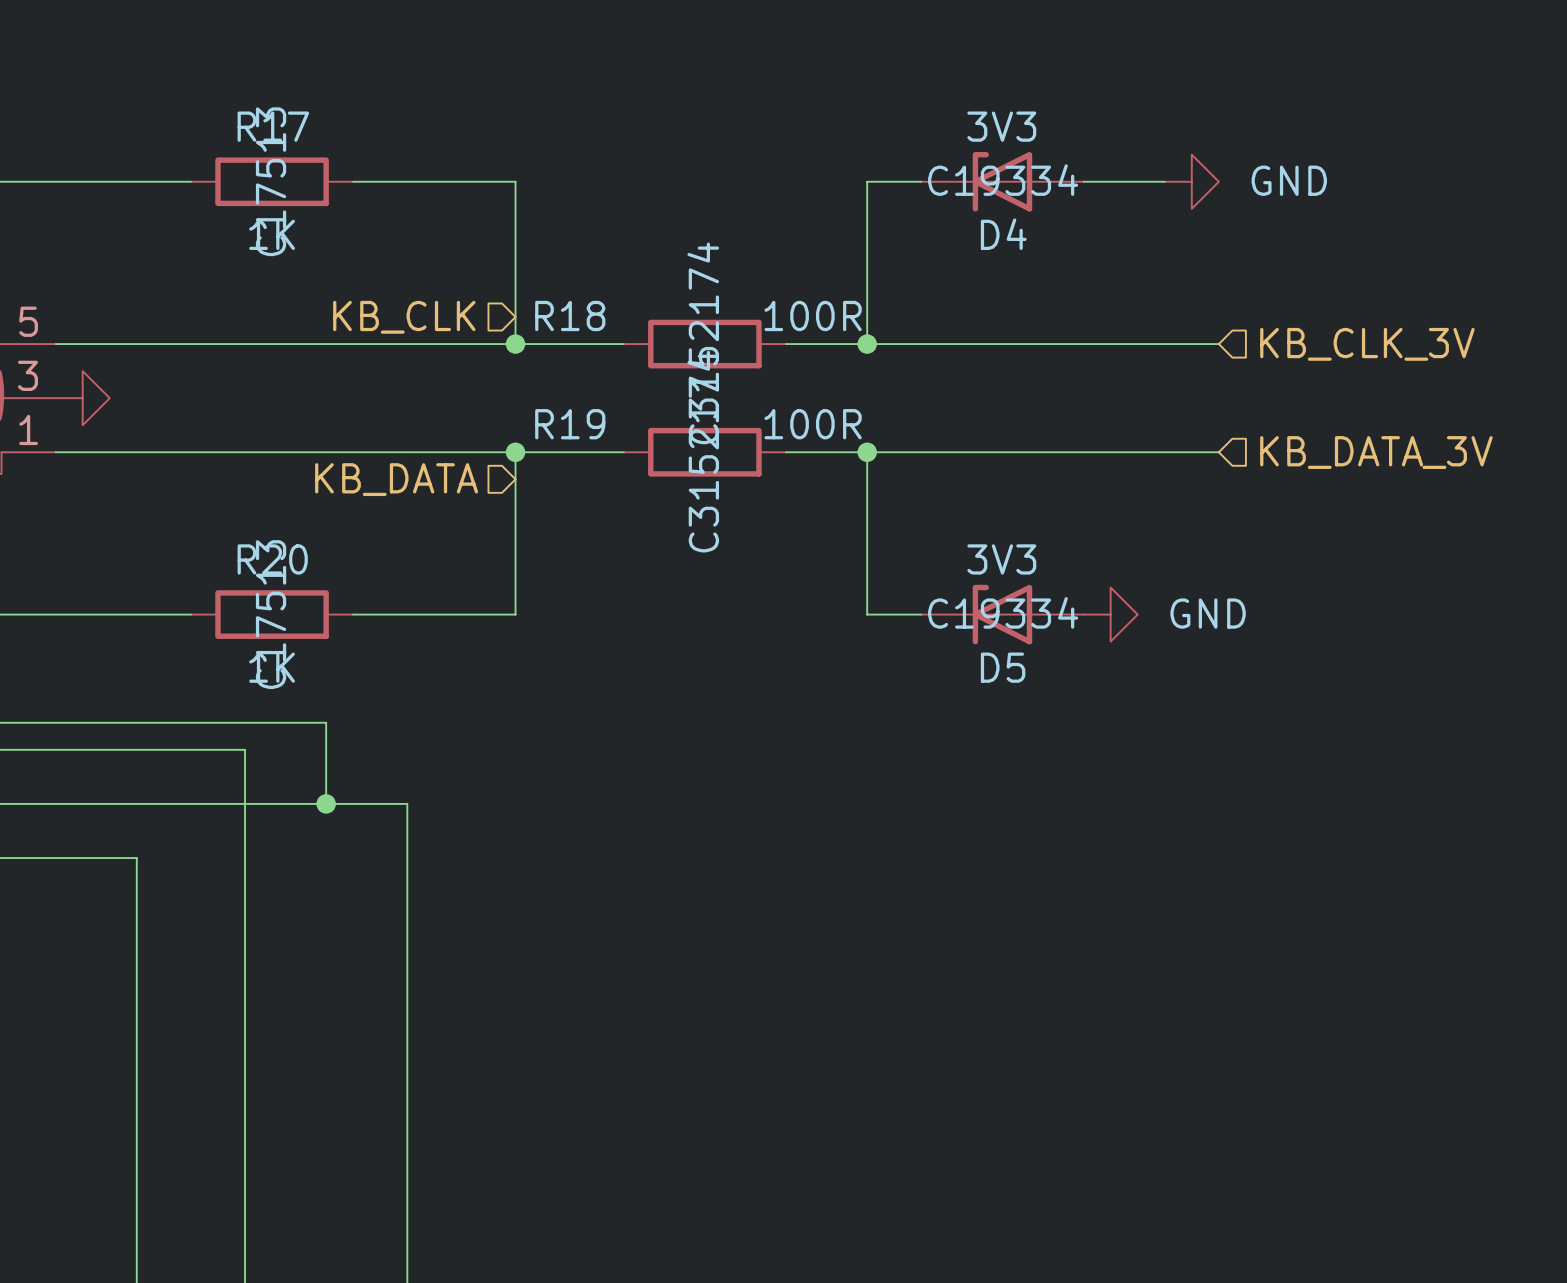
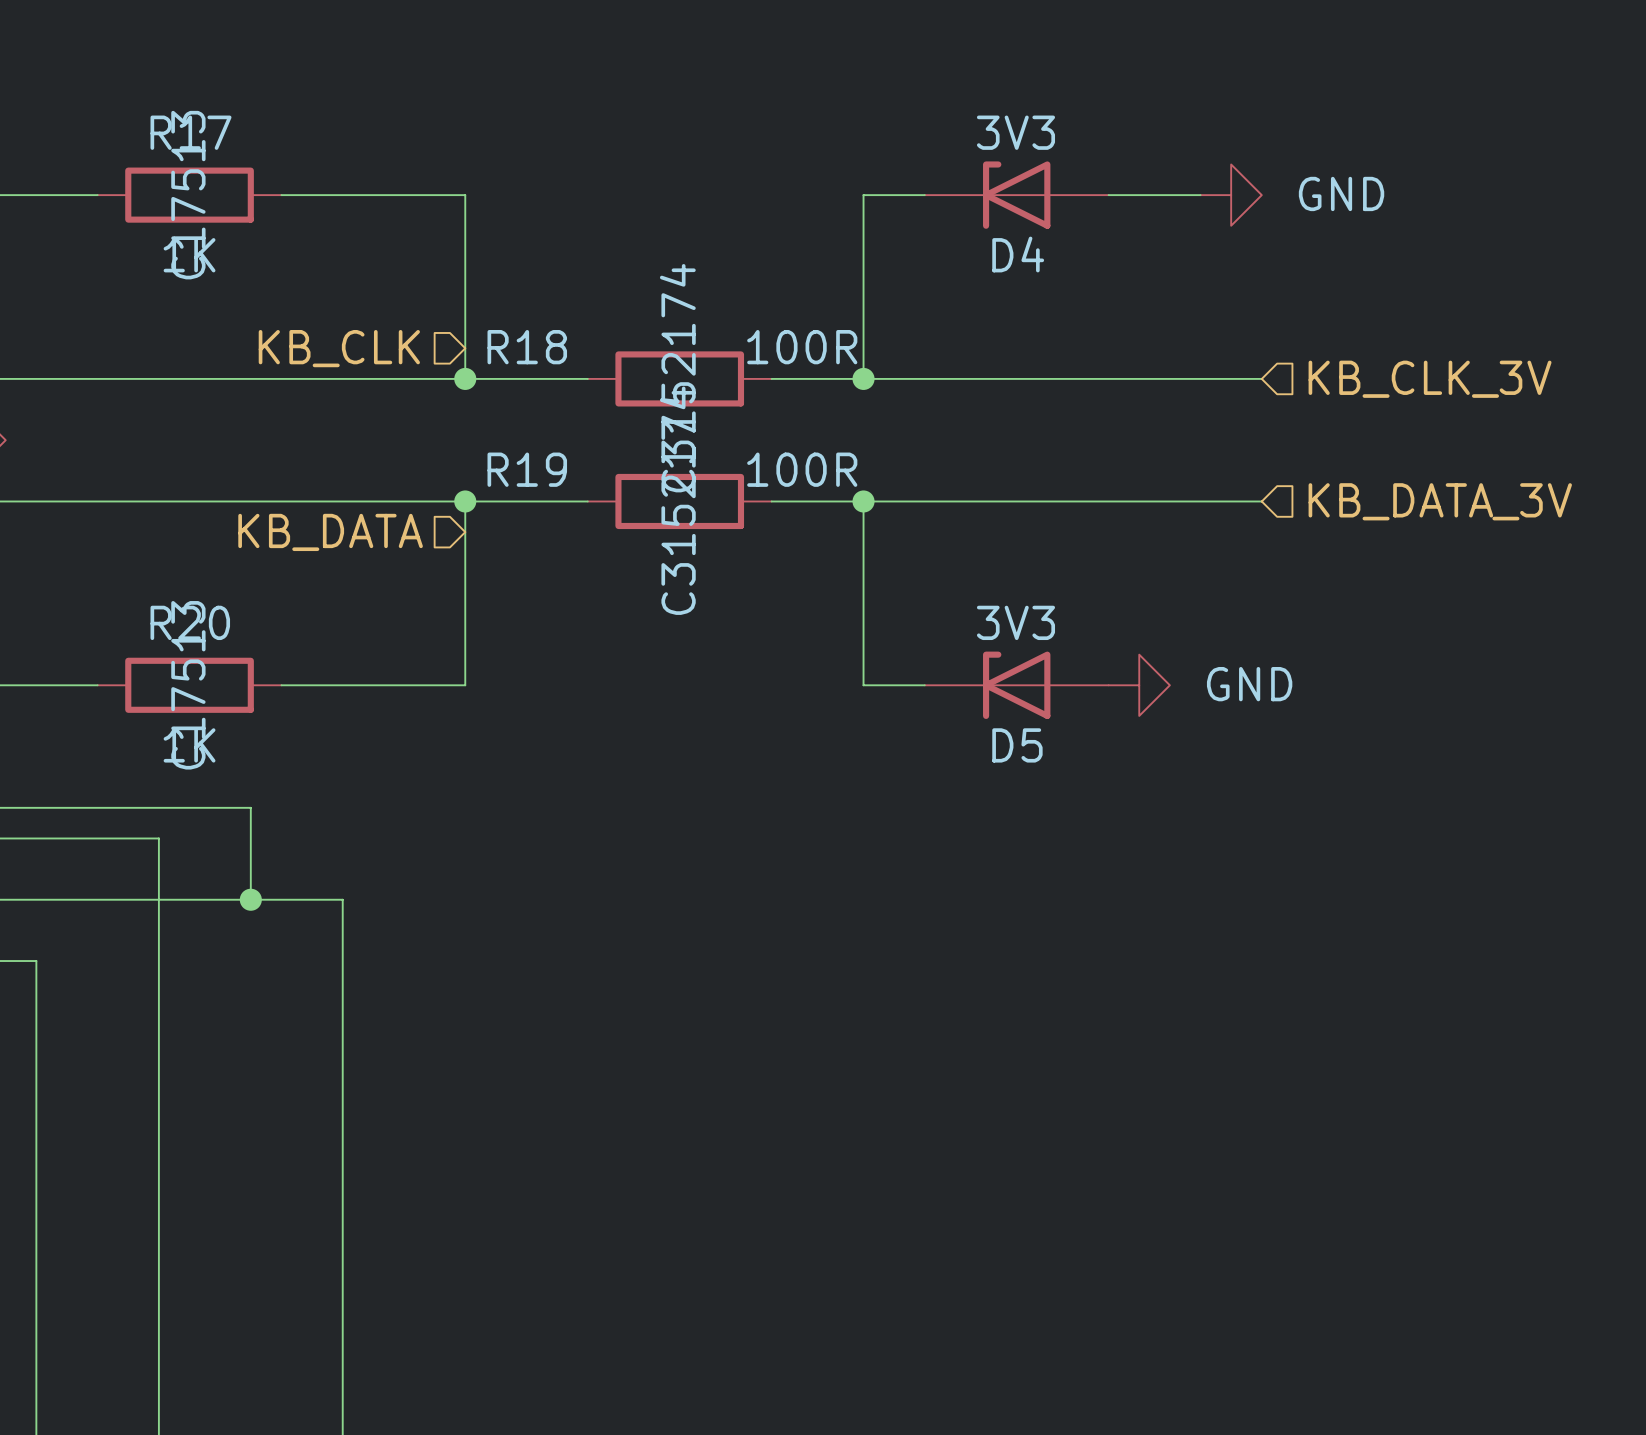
D4 text: C19334 (1003, 180) -> none
D5 text: C19334 (1003, 612) -> none

